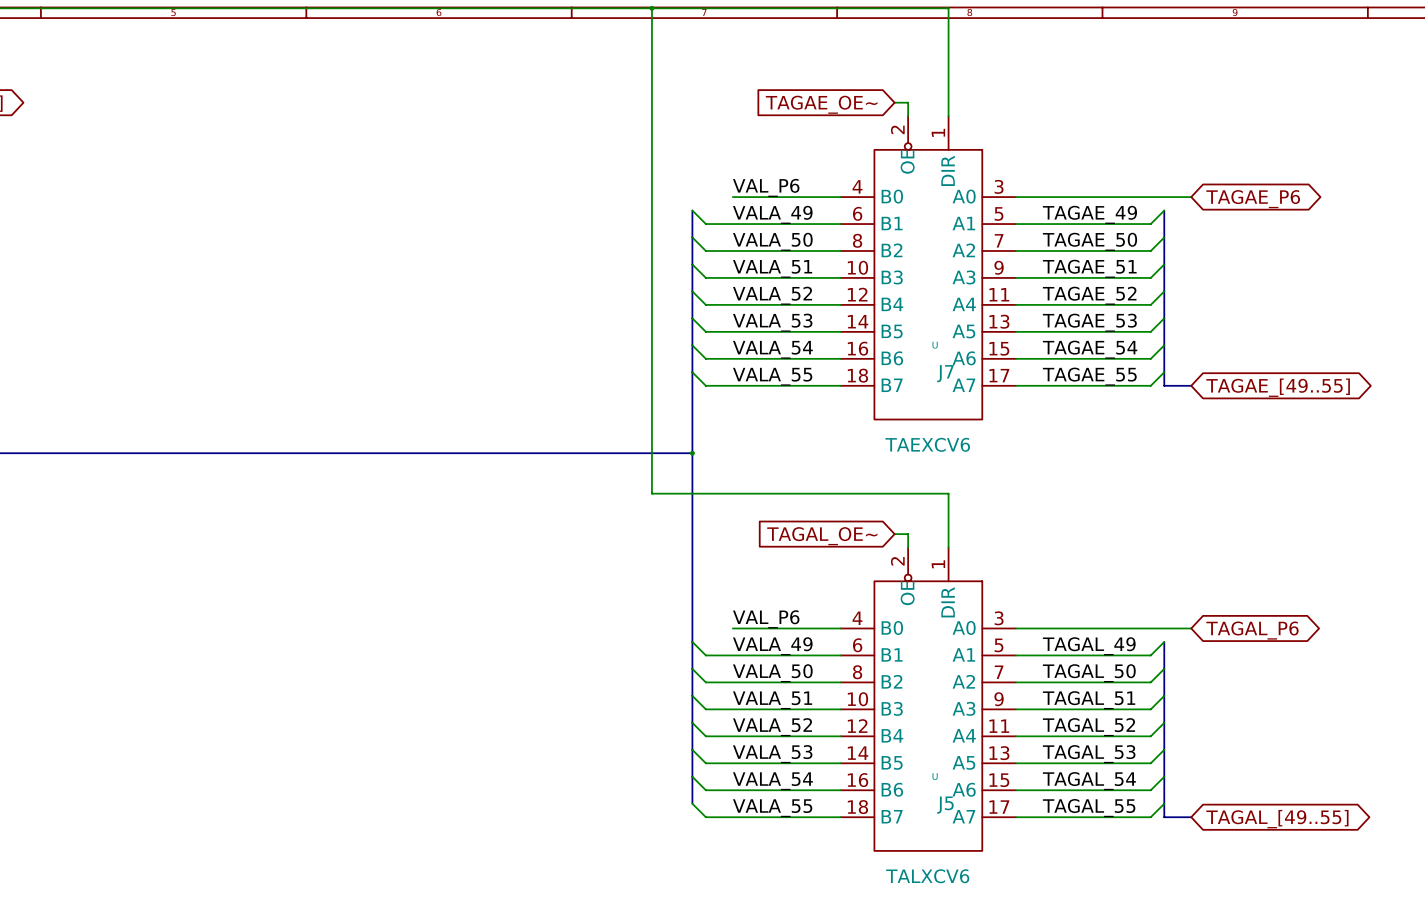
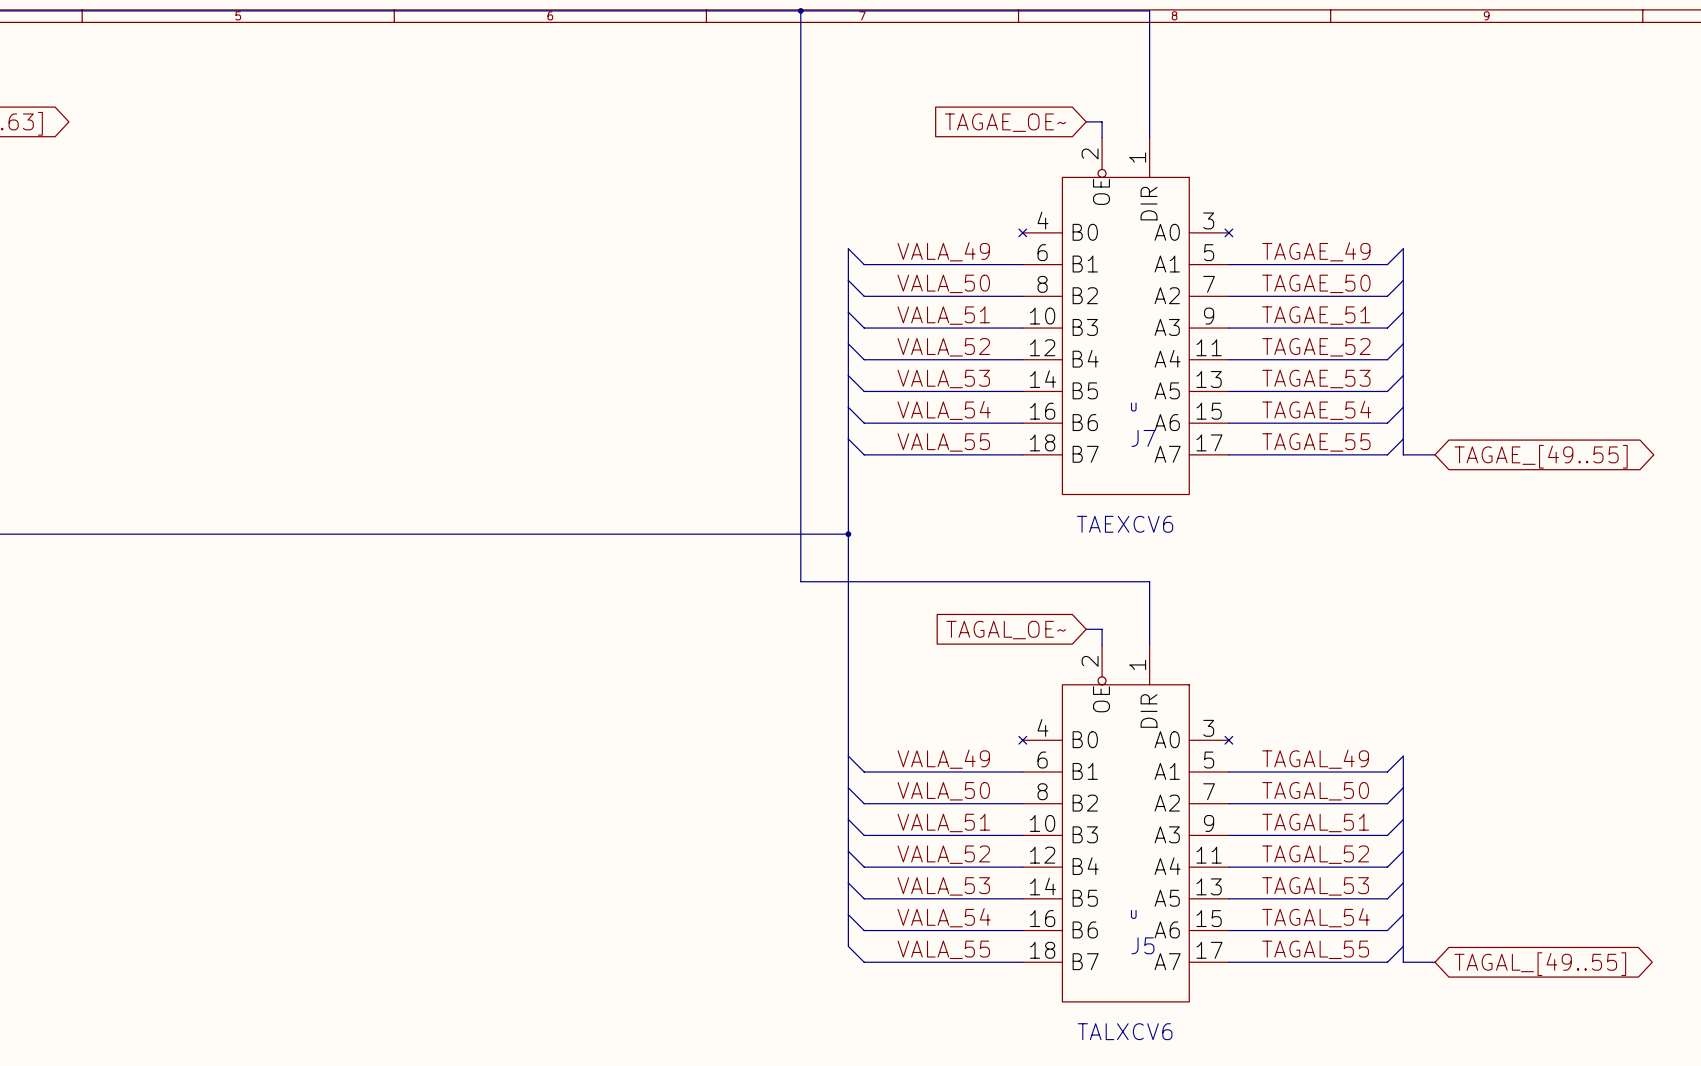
label: VAL_P6 (766, 187) -> none
wire: (732, 197) (840, 197) -> none
no-connect mark: none -> (1022, 232)
wire: (1015, 197) (1191, 197) -> none
no-connect mark: none -> (1228, 232)
global label: TAGAE_P6 (1253, 199) -> none
label: VAL_P6 (766, 619) -> none
wire: (732, 628) (840, 628) -> none
no-connect mark: none -> (1022, 740)
wire: (1015, 628) (1191, 628) -> none
no-connect mark: none -> (1228, 740)
global label: TAGAL_P6 (1252, 630) -> none

